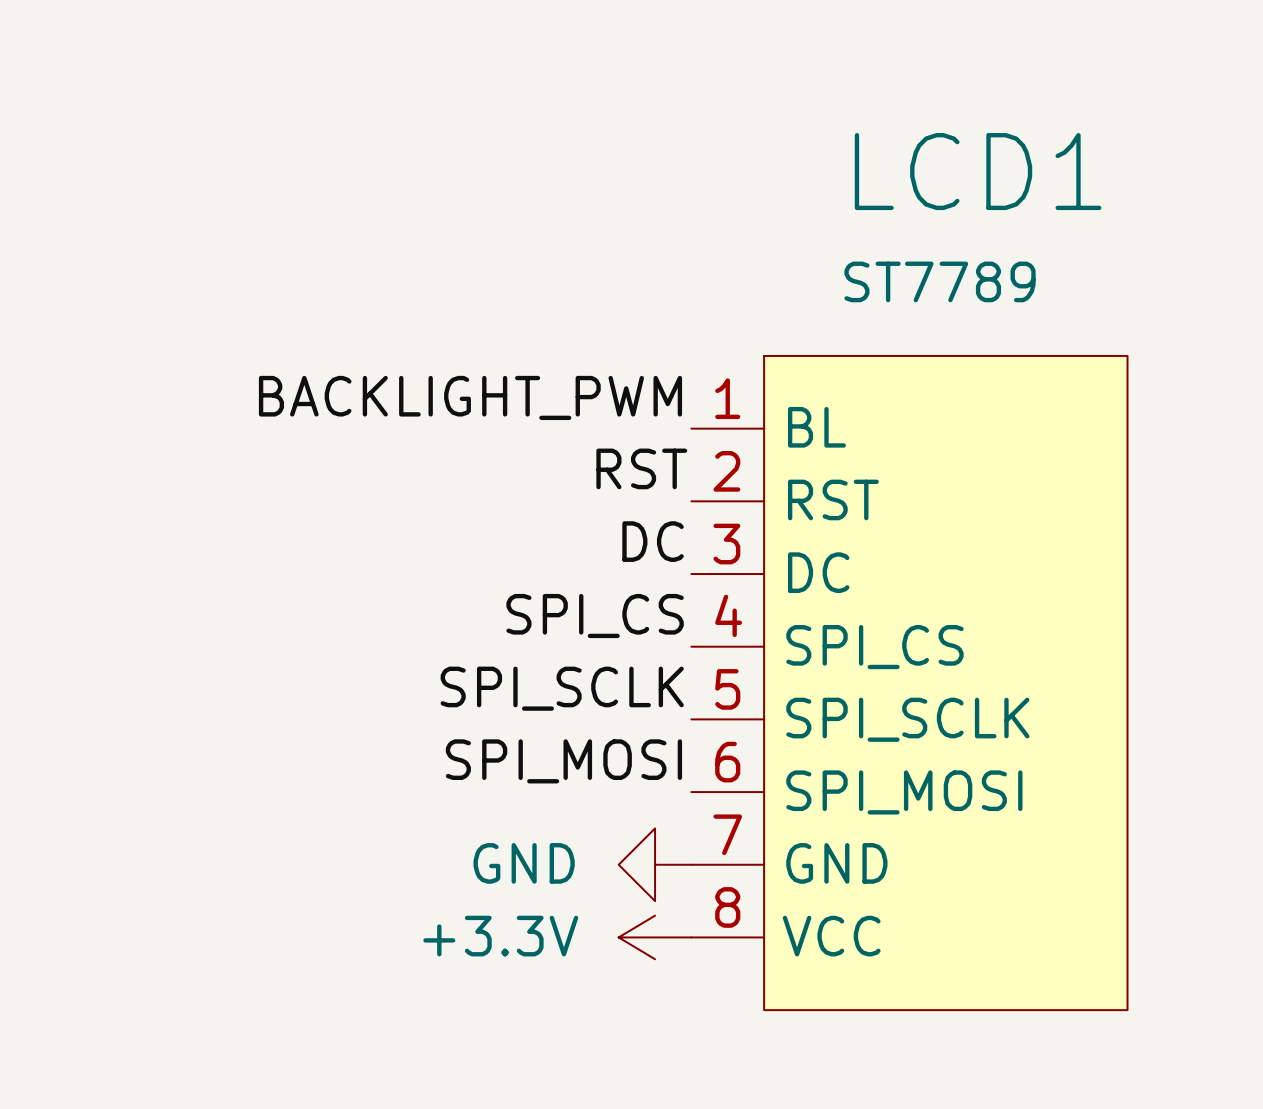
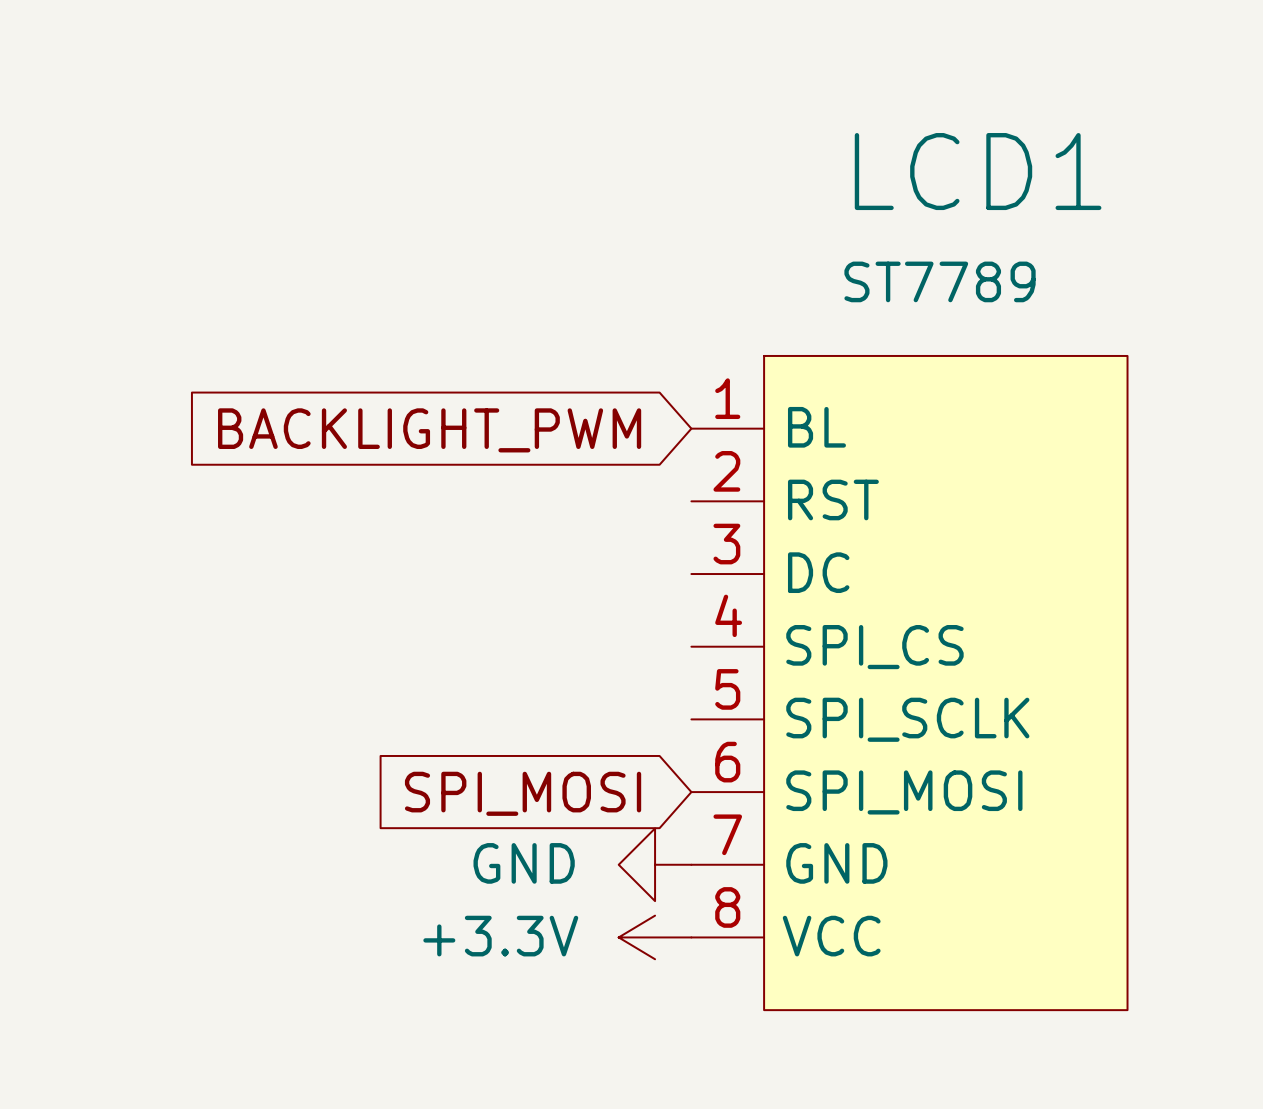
label: BACKLIGHT_PWM (470, 397) -> none
global label: none -> BACKLIGHT_PWM (429, 430)
label: RST (641, 468) -> none
label: DC (653, 541) -> none
label: SPI_CS (595, 616) -> none
label: SPI_SCLK (562, 688) -> none
label: SPI_MOSI (563, 761) -> none
global label: none -> SPI_MOSI (523, 793)

